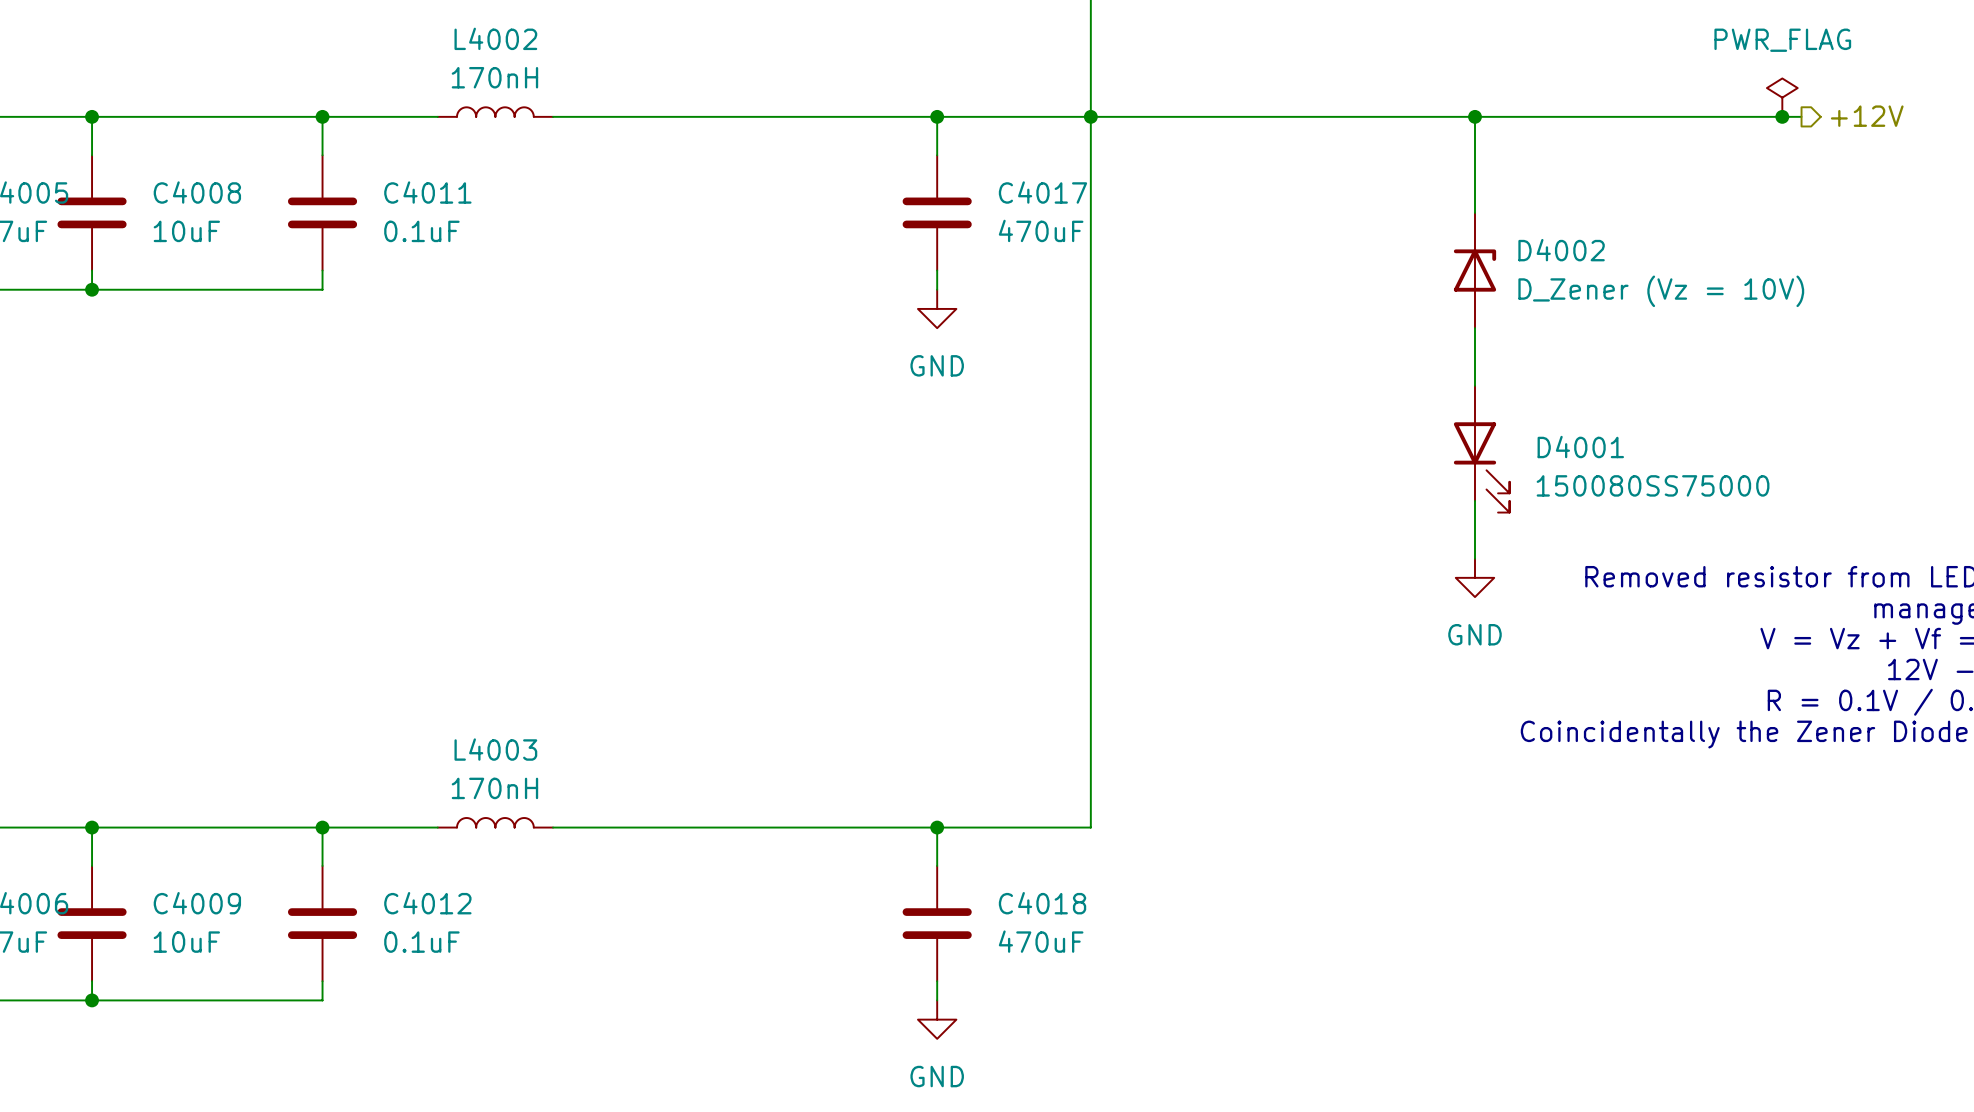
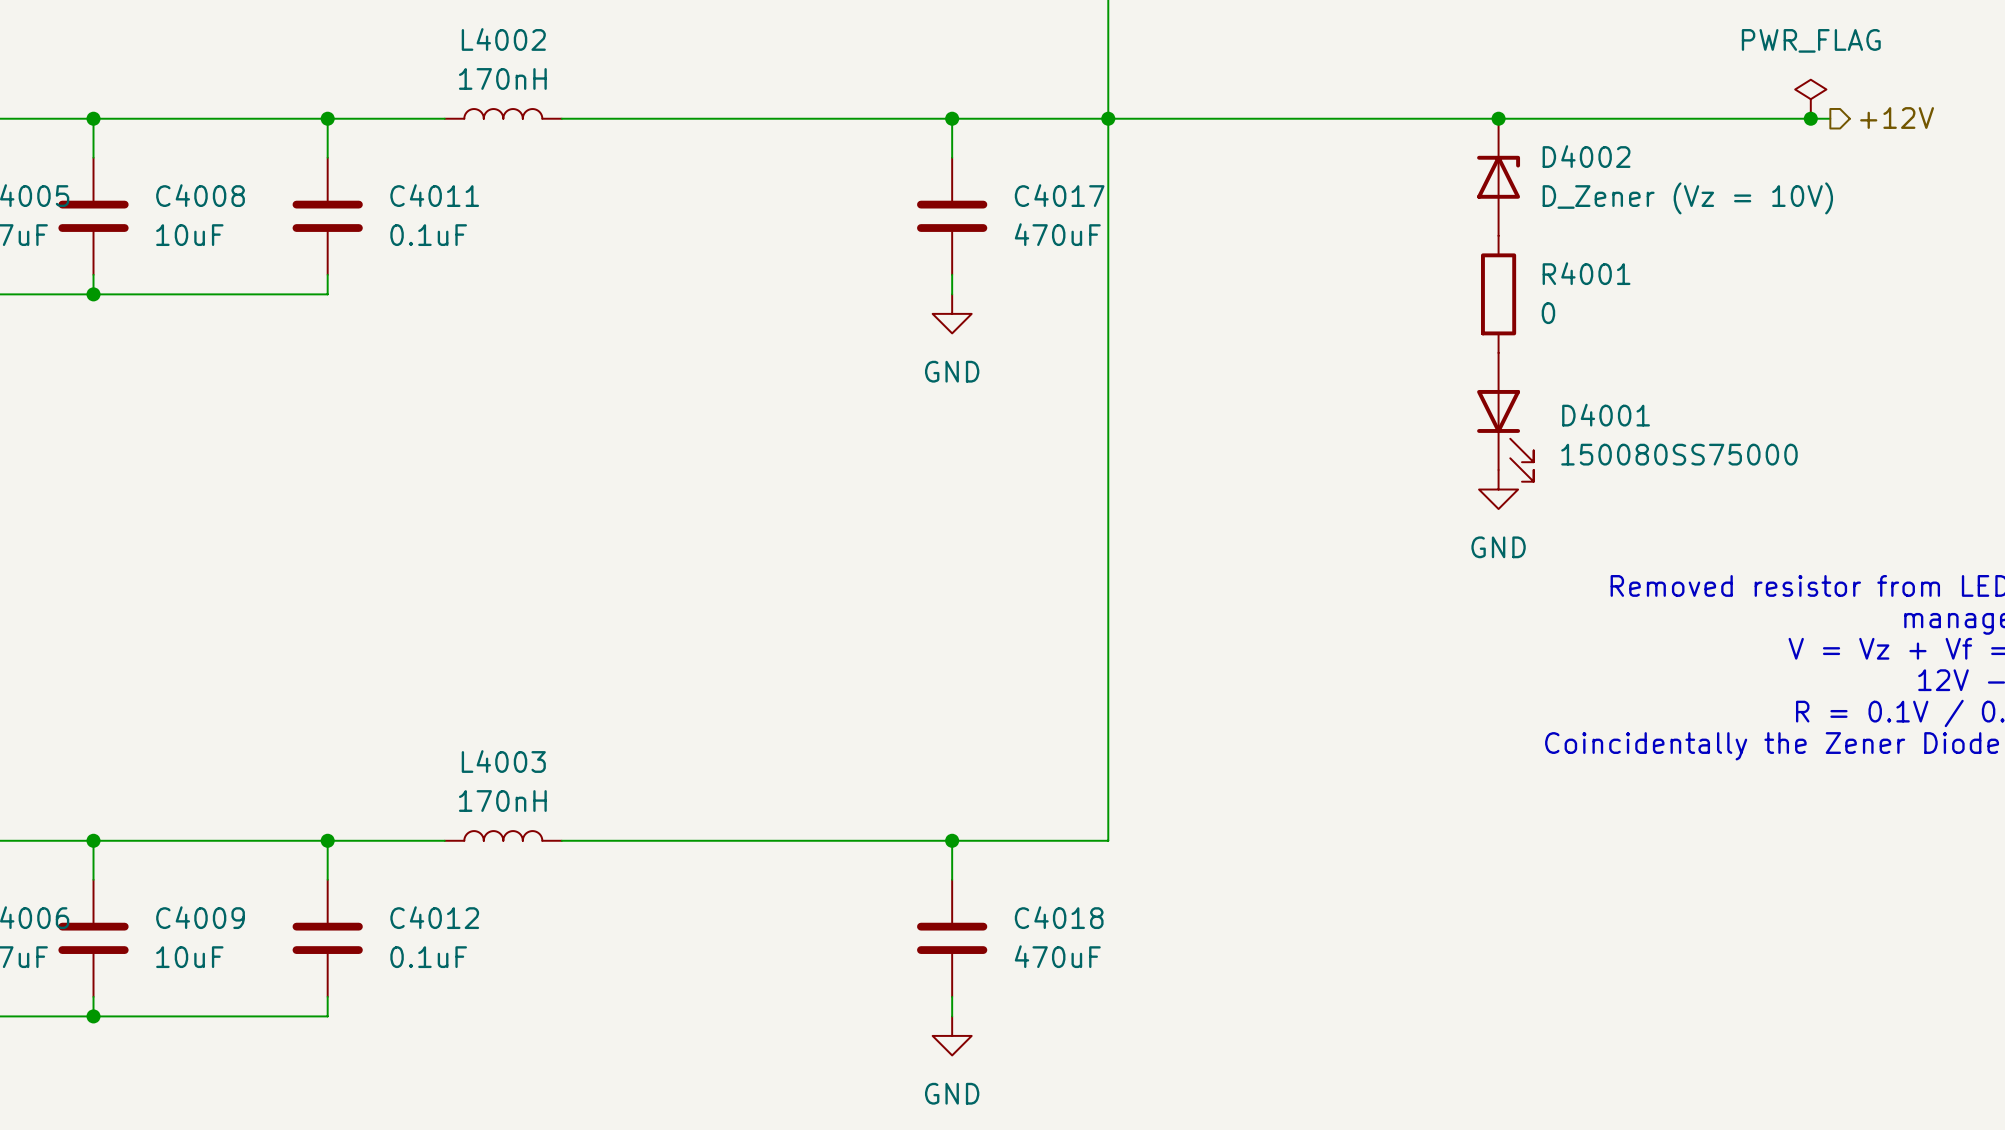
D4002 position: (1475, 270) -> (1498, 177)
R4001: none -> 0 (1498, 294)
D4001 position: (1481, 449) -> (1505, 417)
wire: (1475, 501) (1475, 558) -> none
power symbol position: GND (1475, 577) -> GND (1498, 489)

